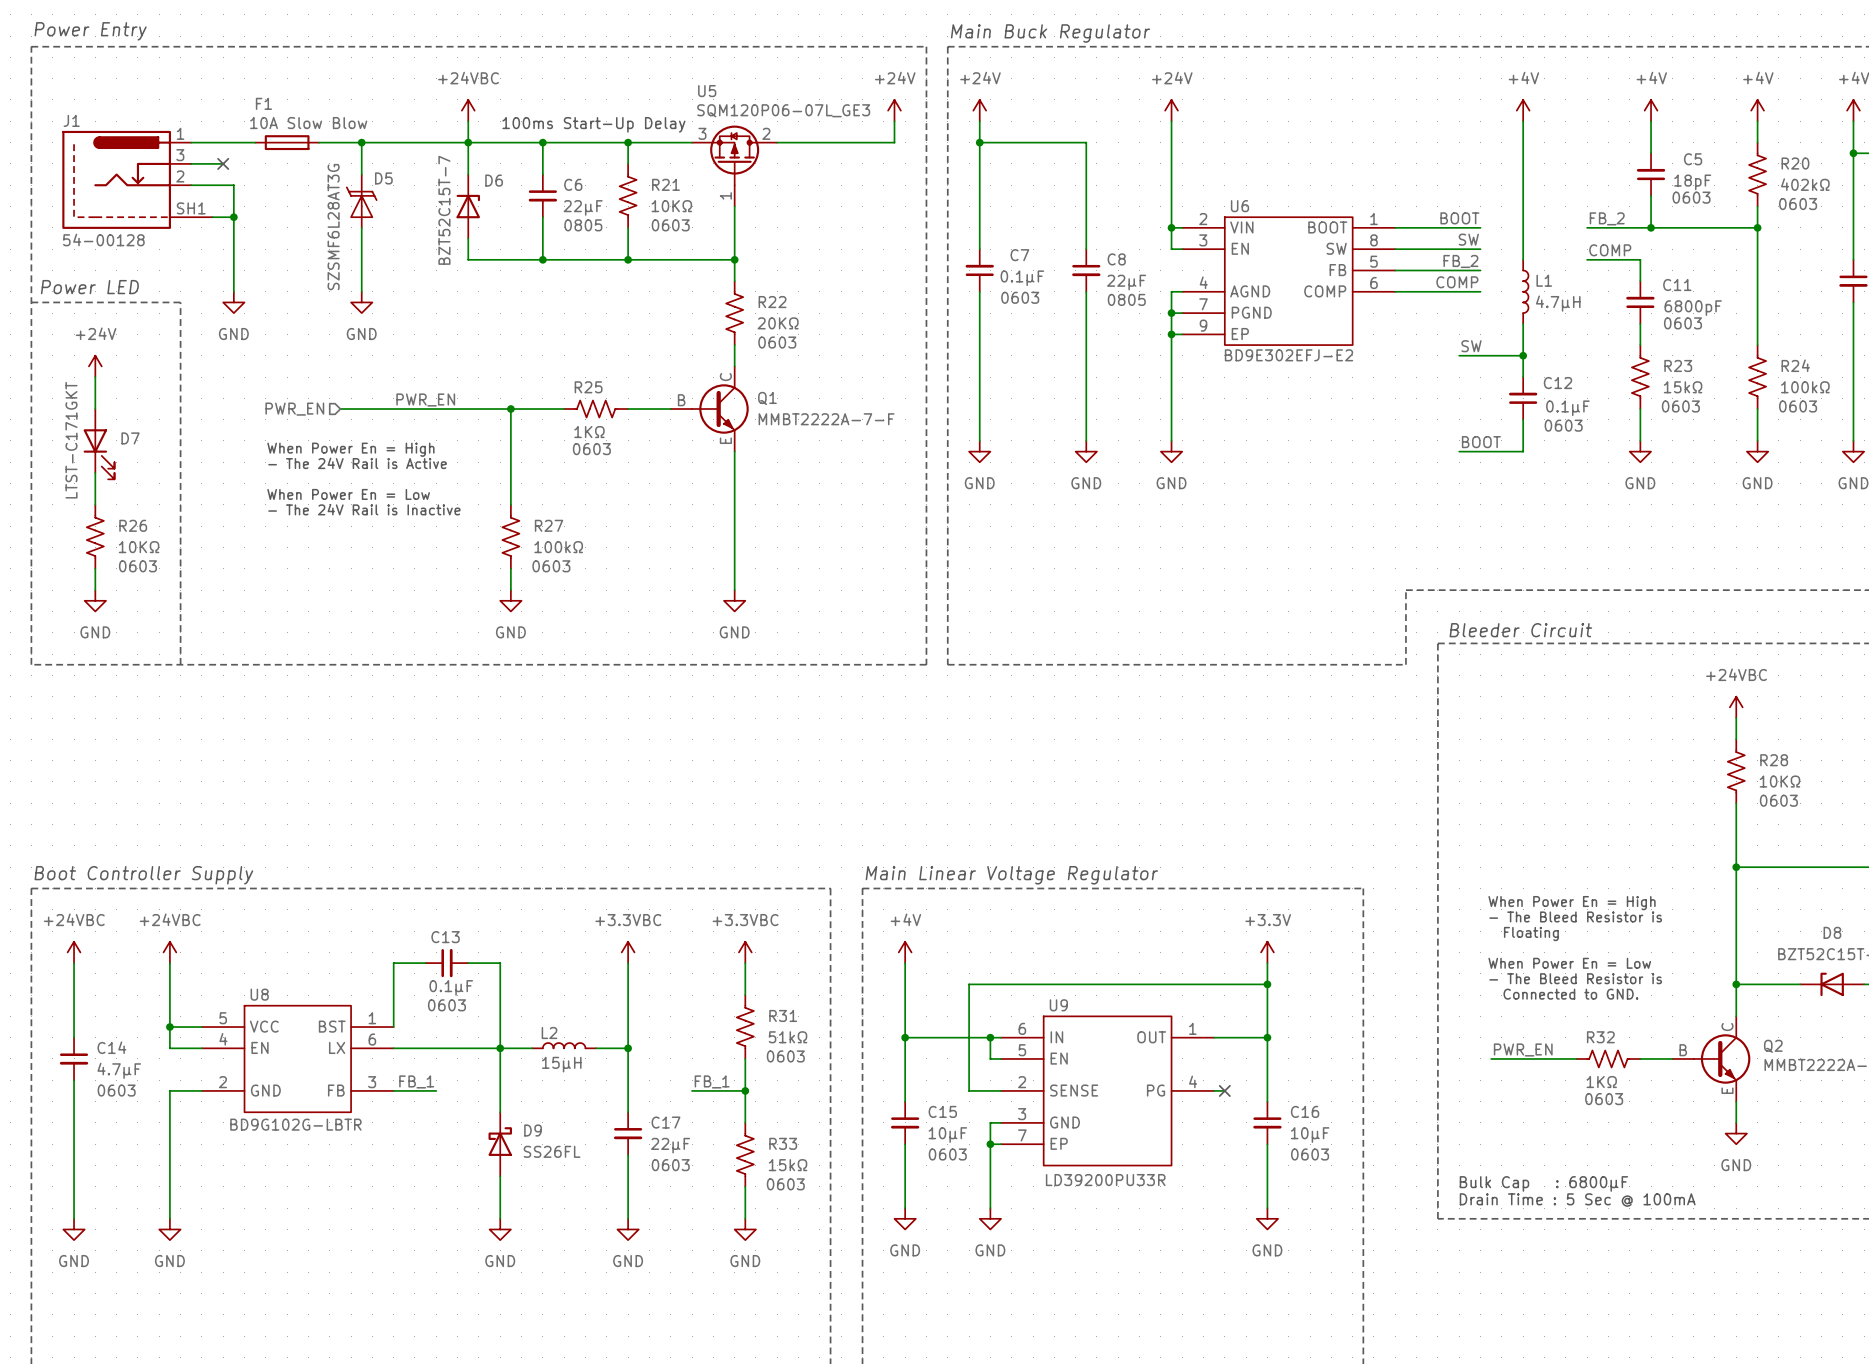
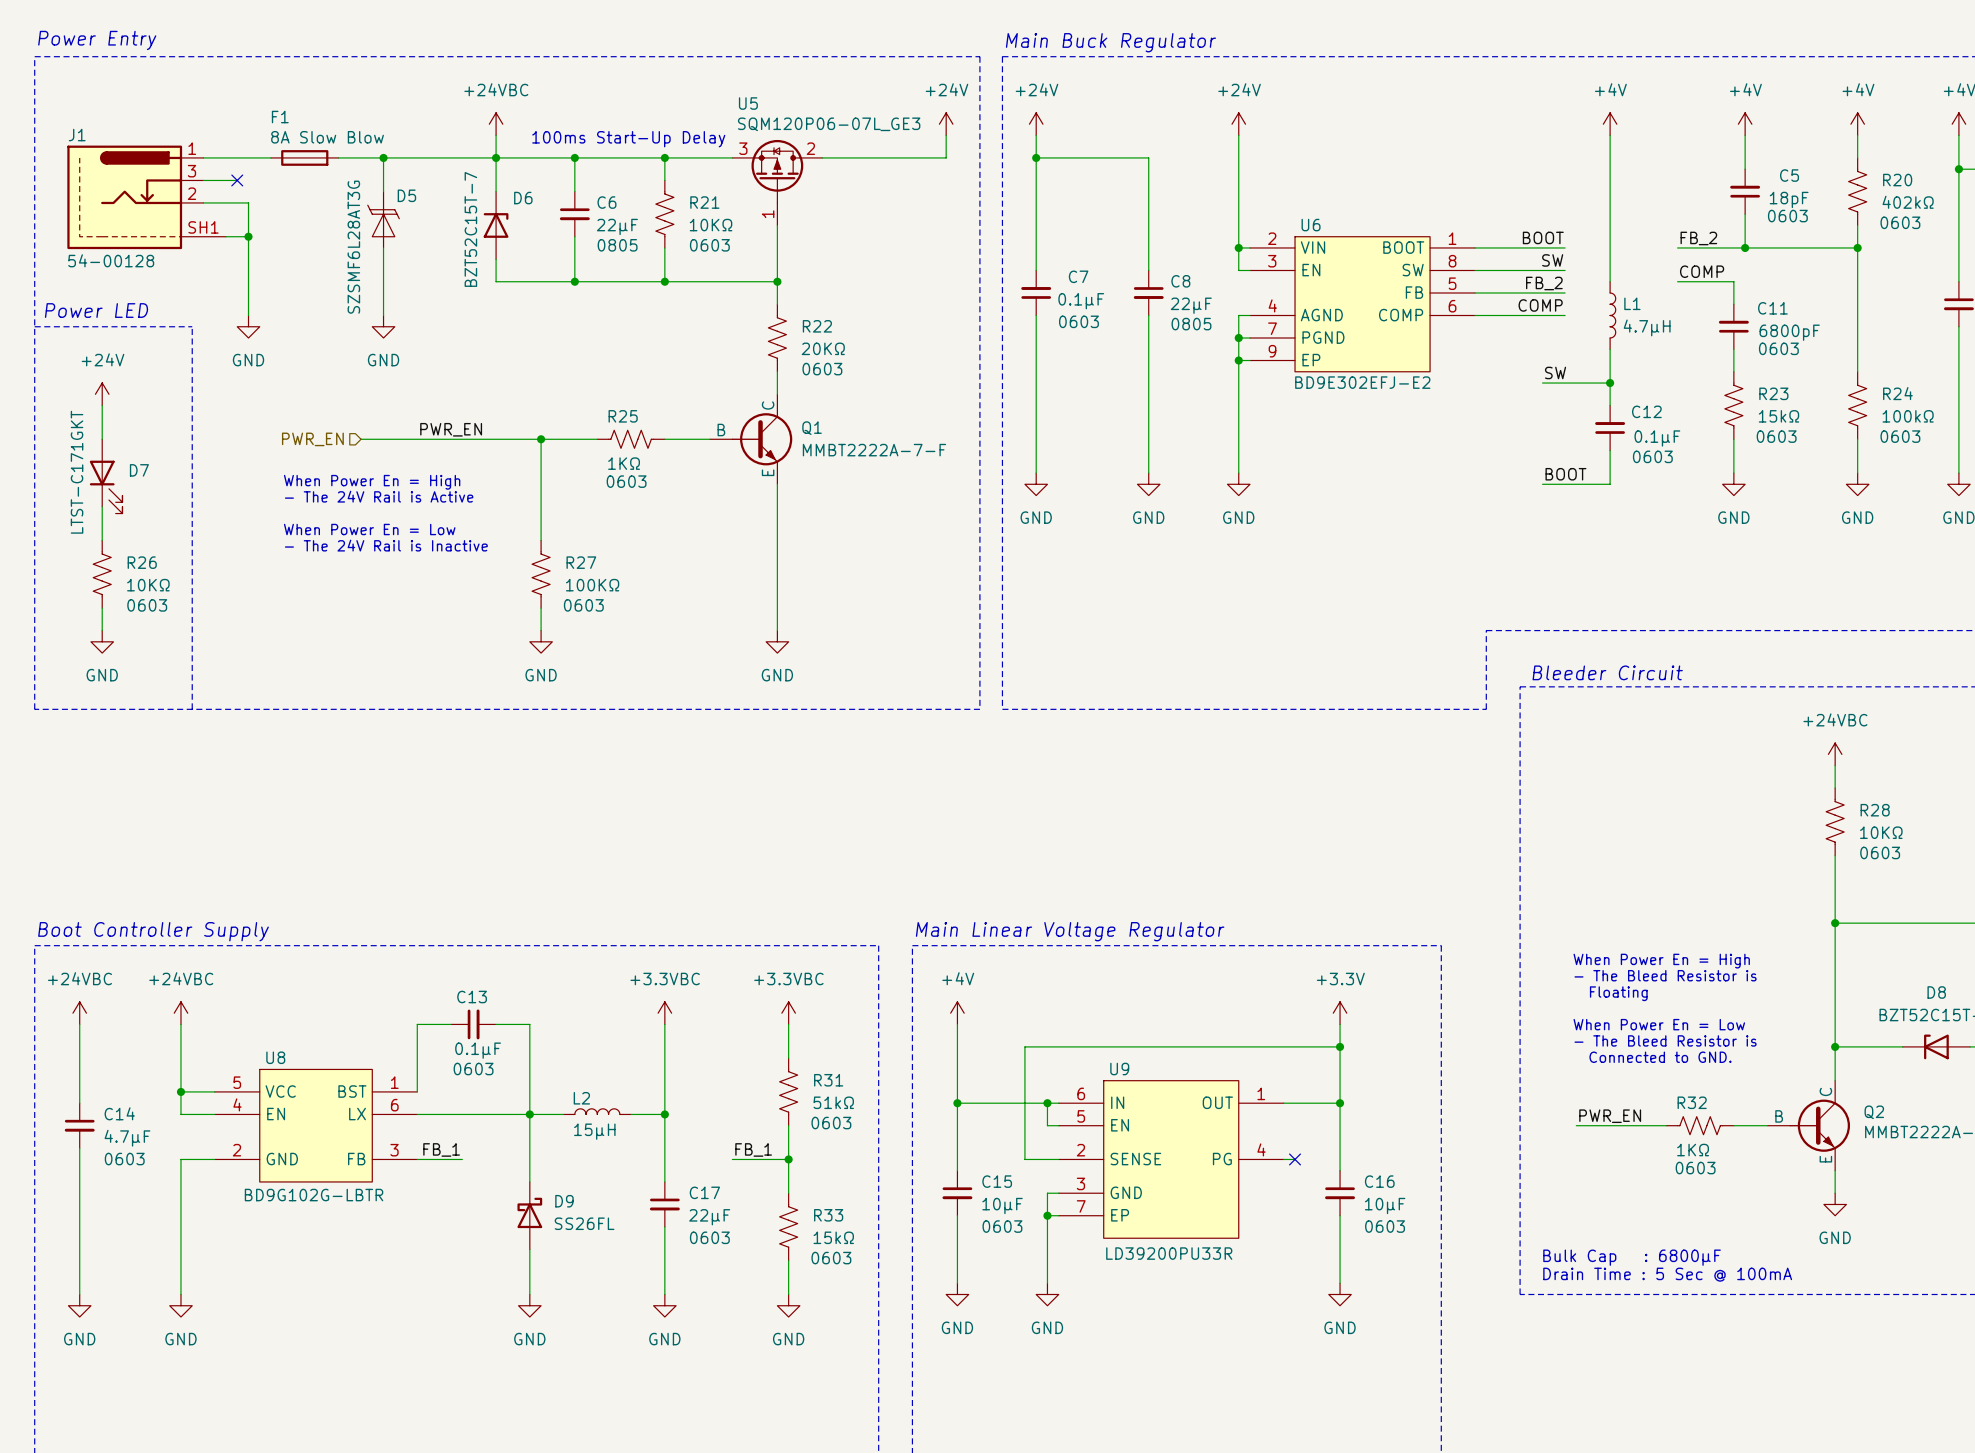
F1 value: 10A Slow Blow (308, 123) -> 8A Slow Blow (327, 137)
R27 value: 100kΩ (558, 547) -> 100KΩ (592, 585)

